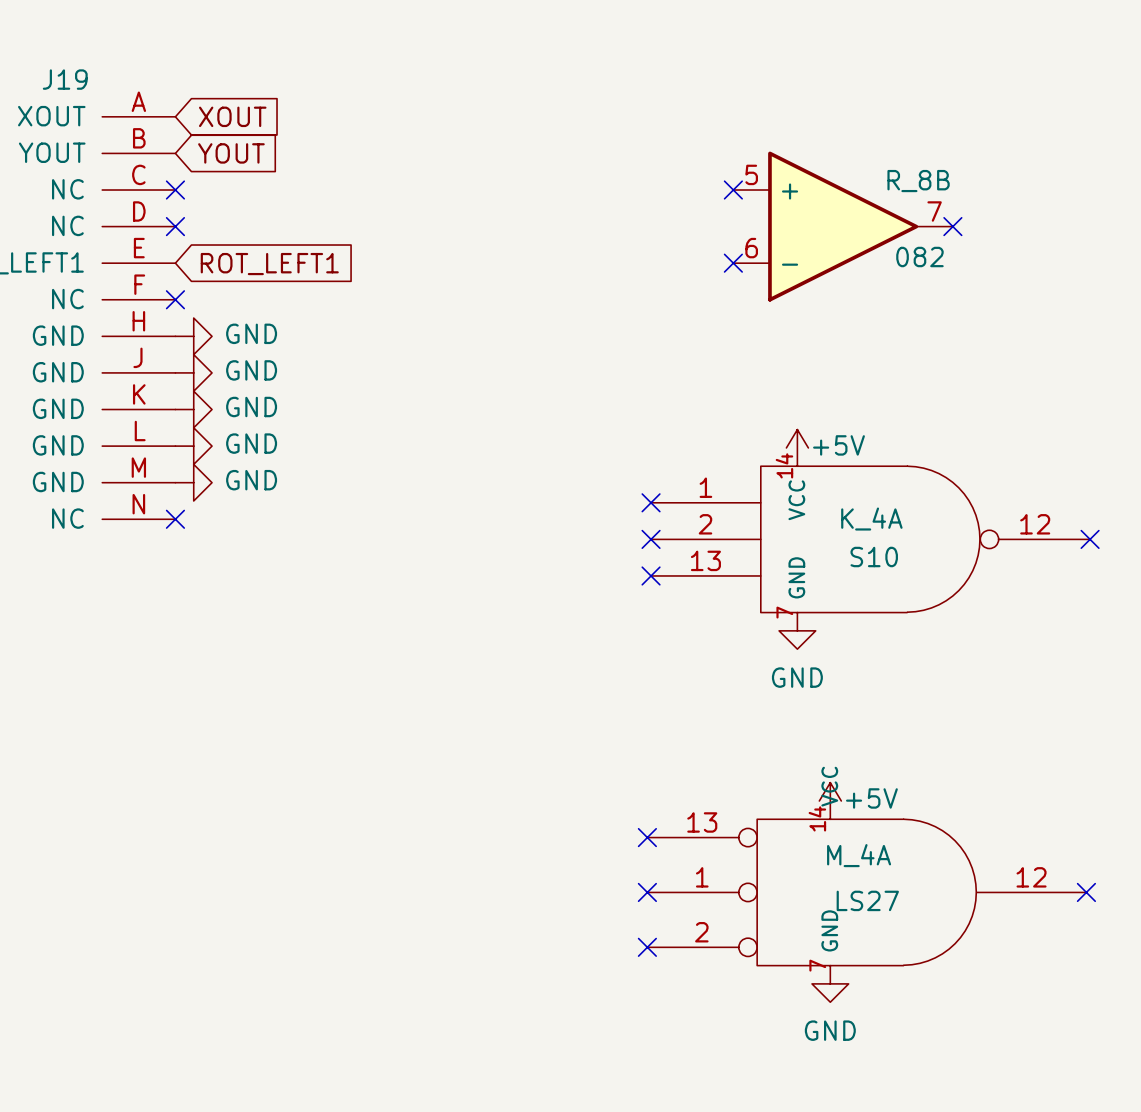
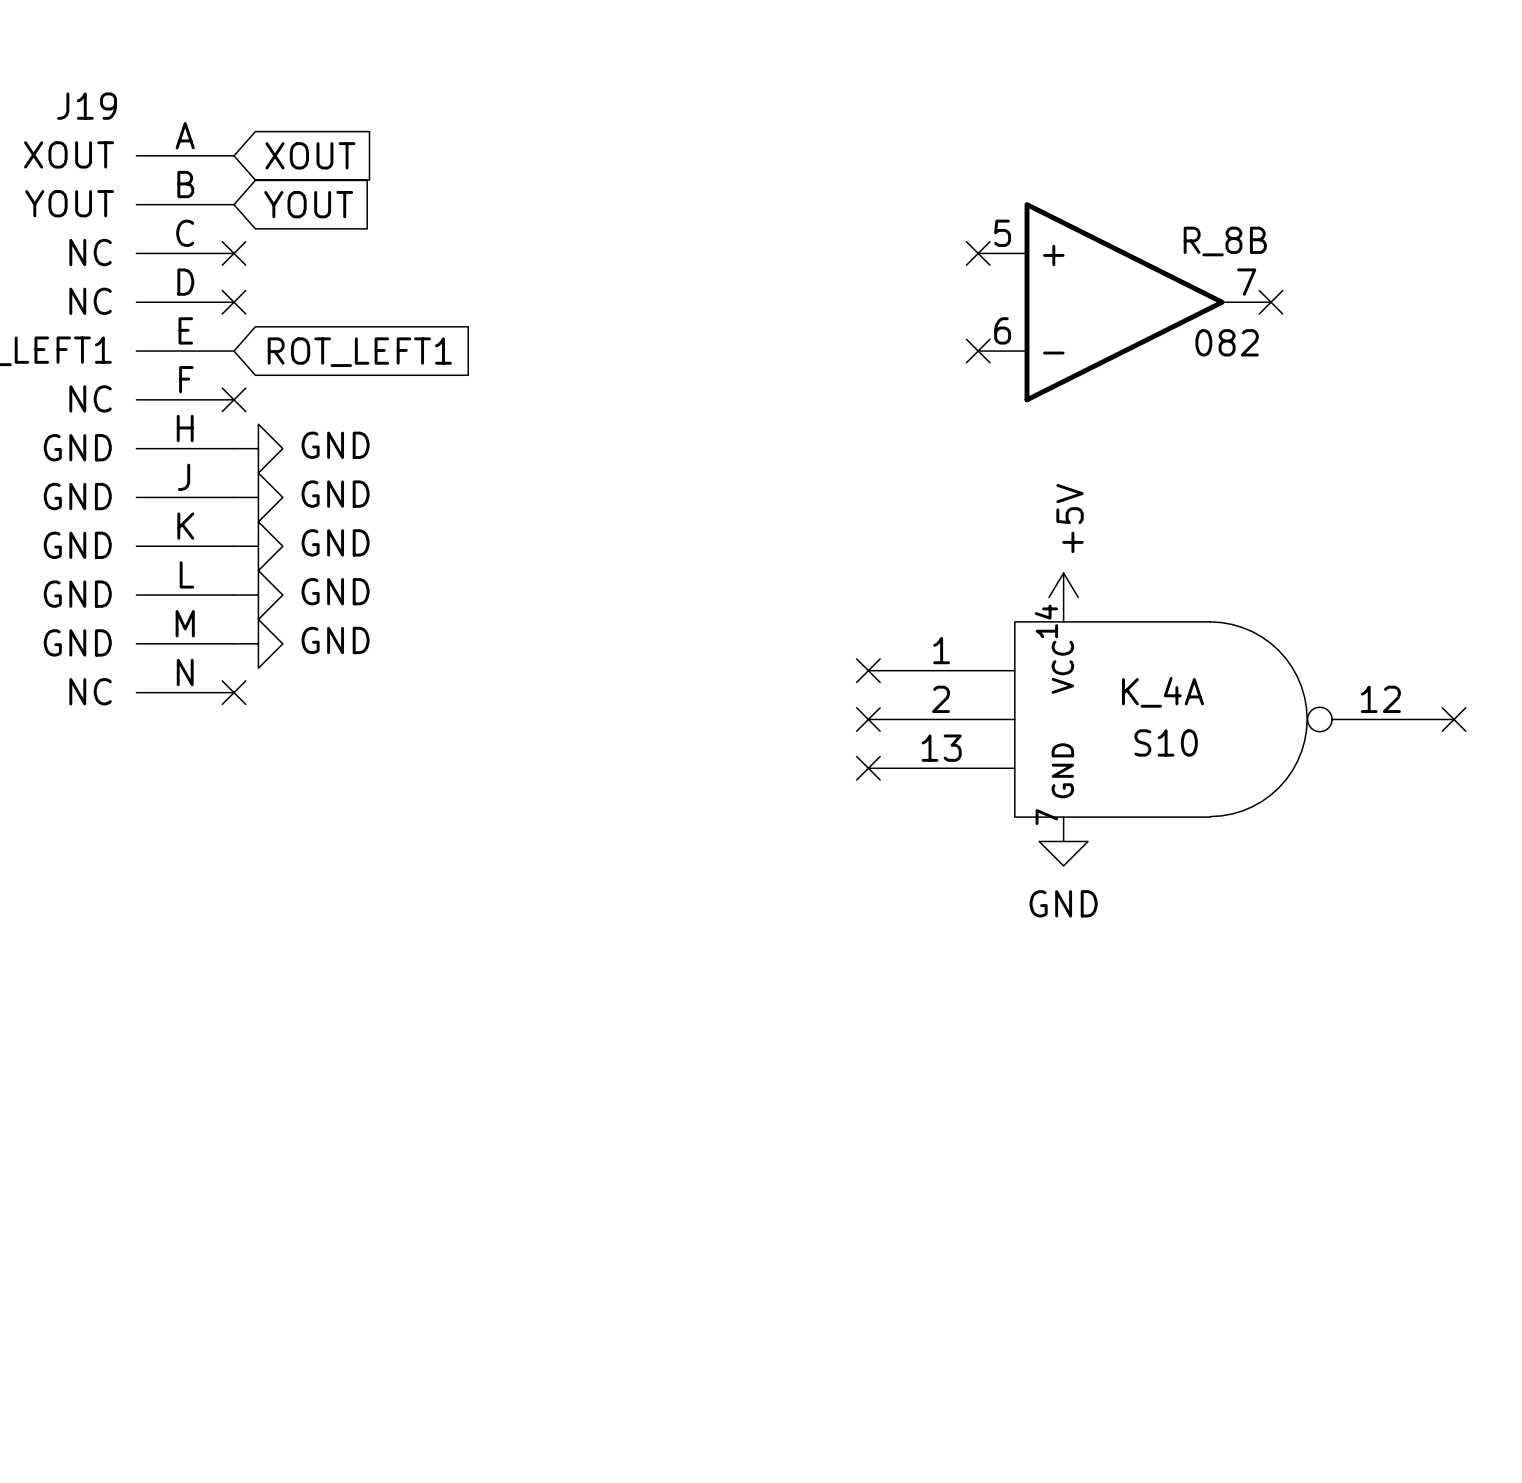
power symbol text rotation: 0° (838, 445) -> 90° counterclockwise (1070, 518)
power symbol text position: +5V (838, 445) -> +5V (1070, 518)
power symbol: +5V (830, 800) -> none
no-connect mark: (647, 837) -> none
no-connect mark: (647, 892) -> none
M_4A: LS27 (866, 892) -> none
no-connect mark: (1086, 892) -> none
no-connect mark: (647, 947) -> none
power symbol: GND (830, 983) -> none

